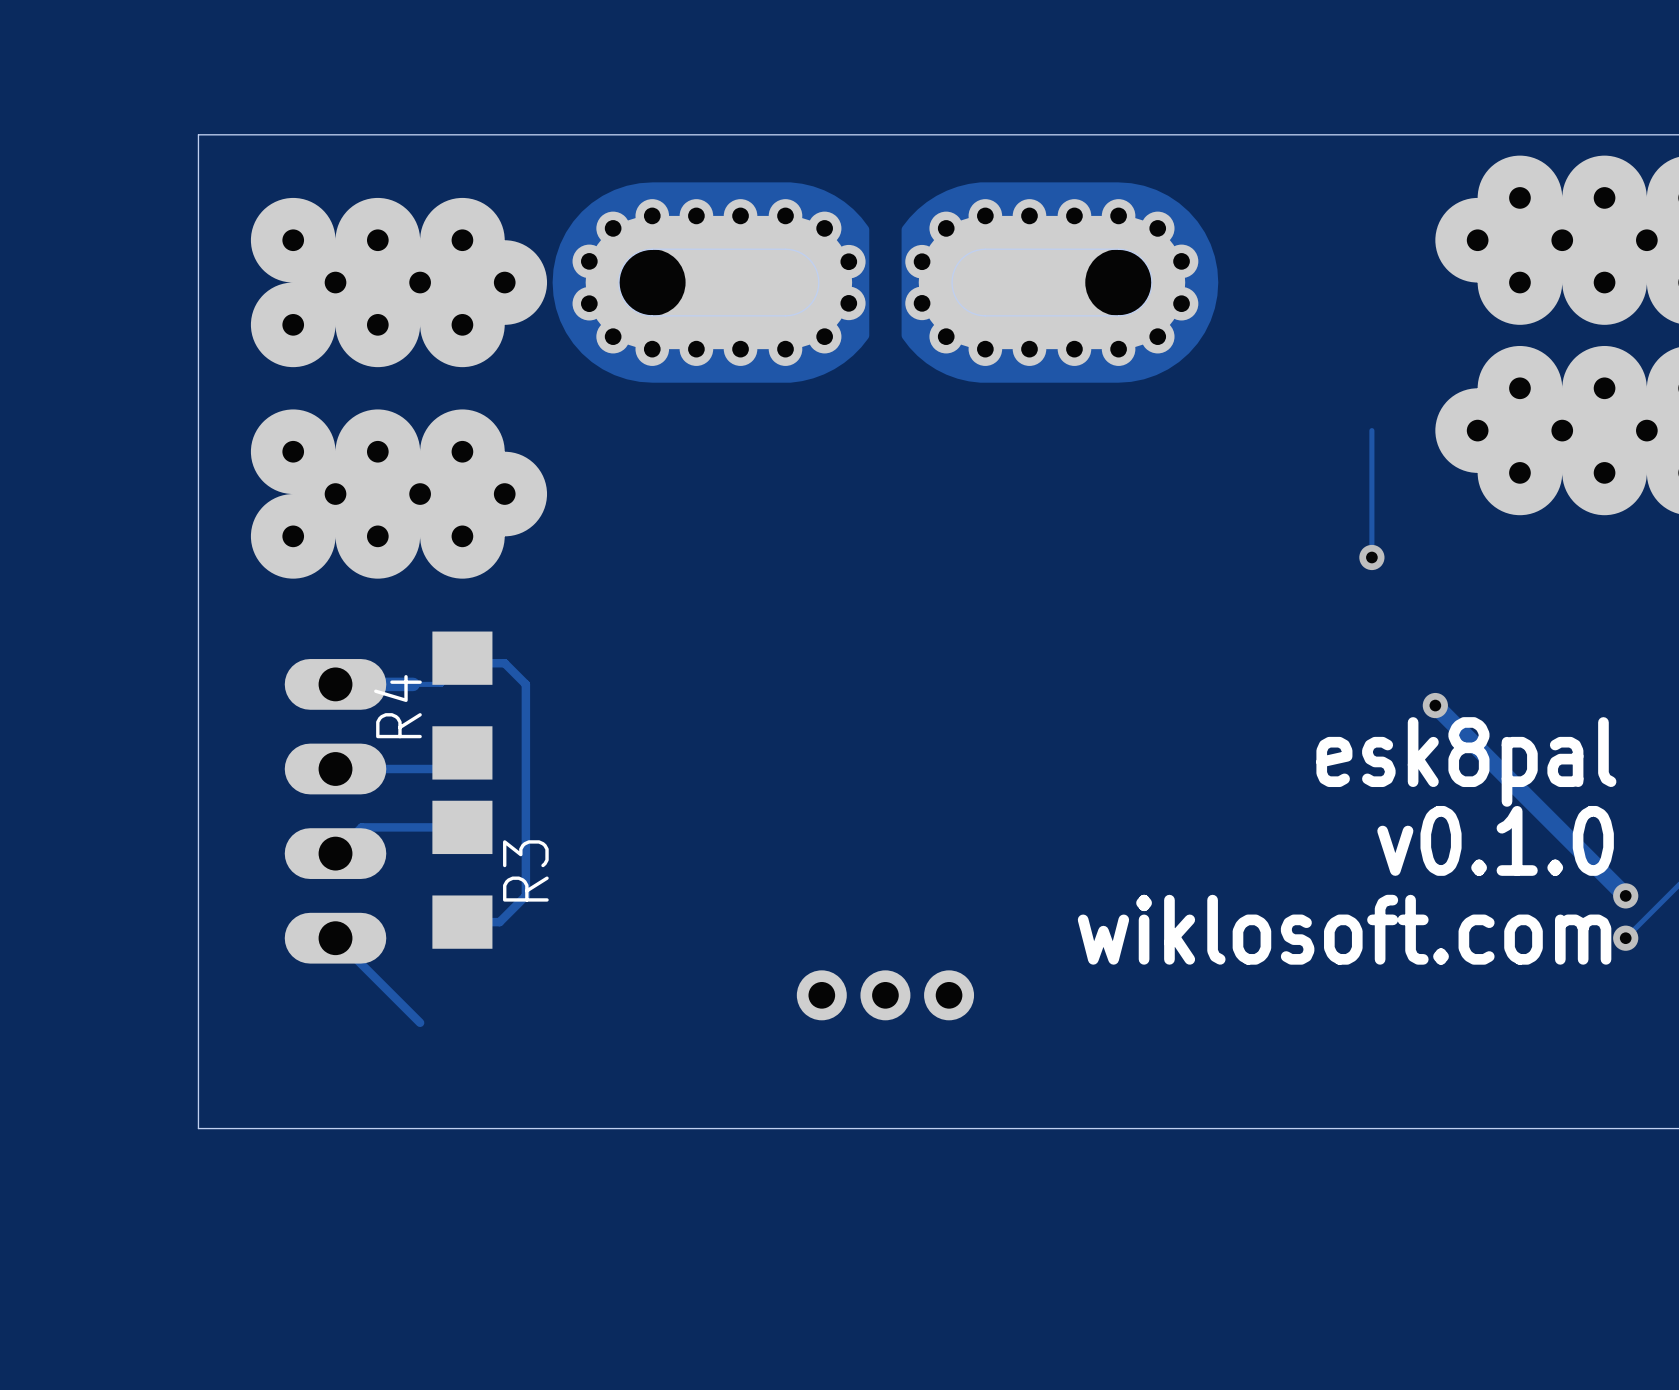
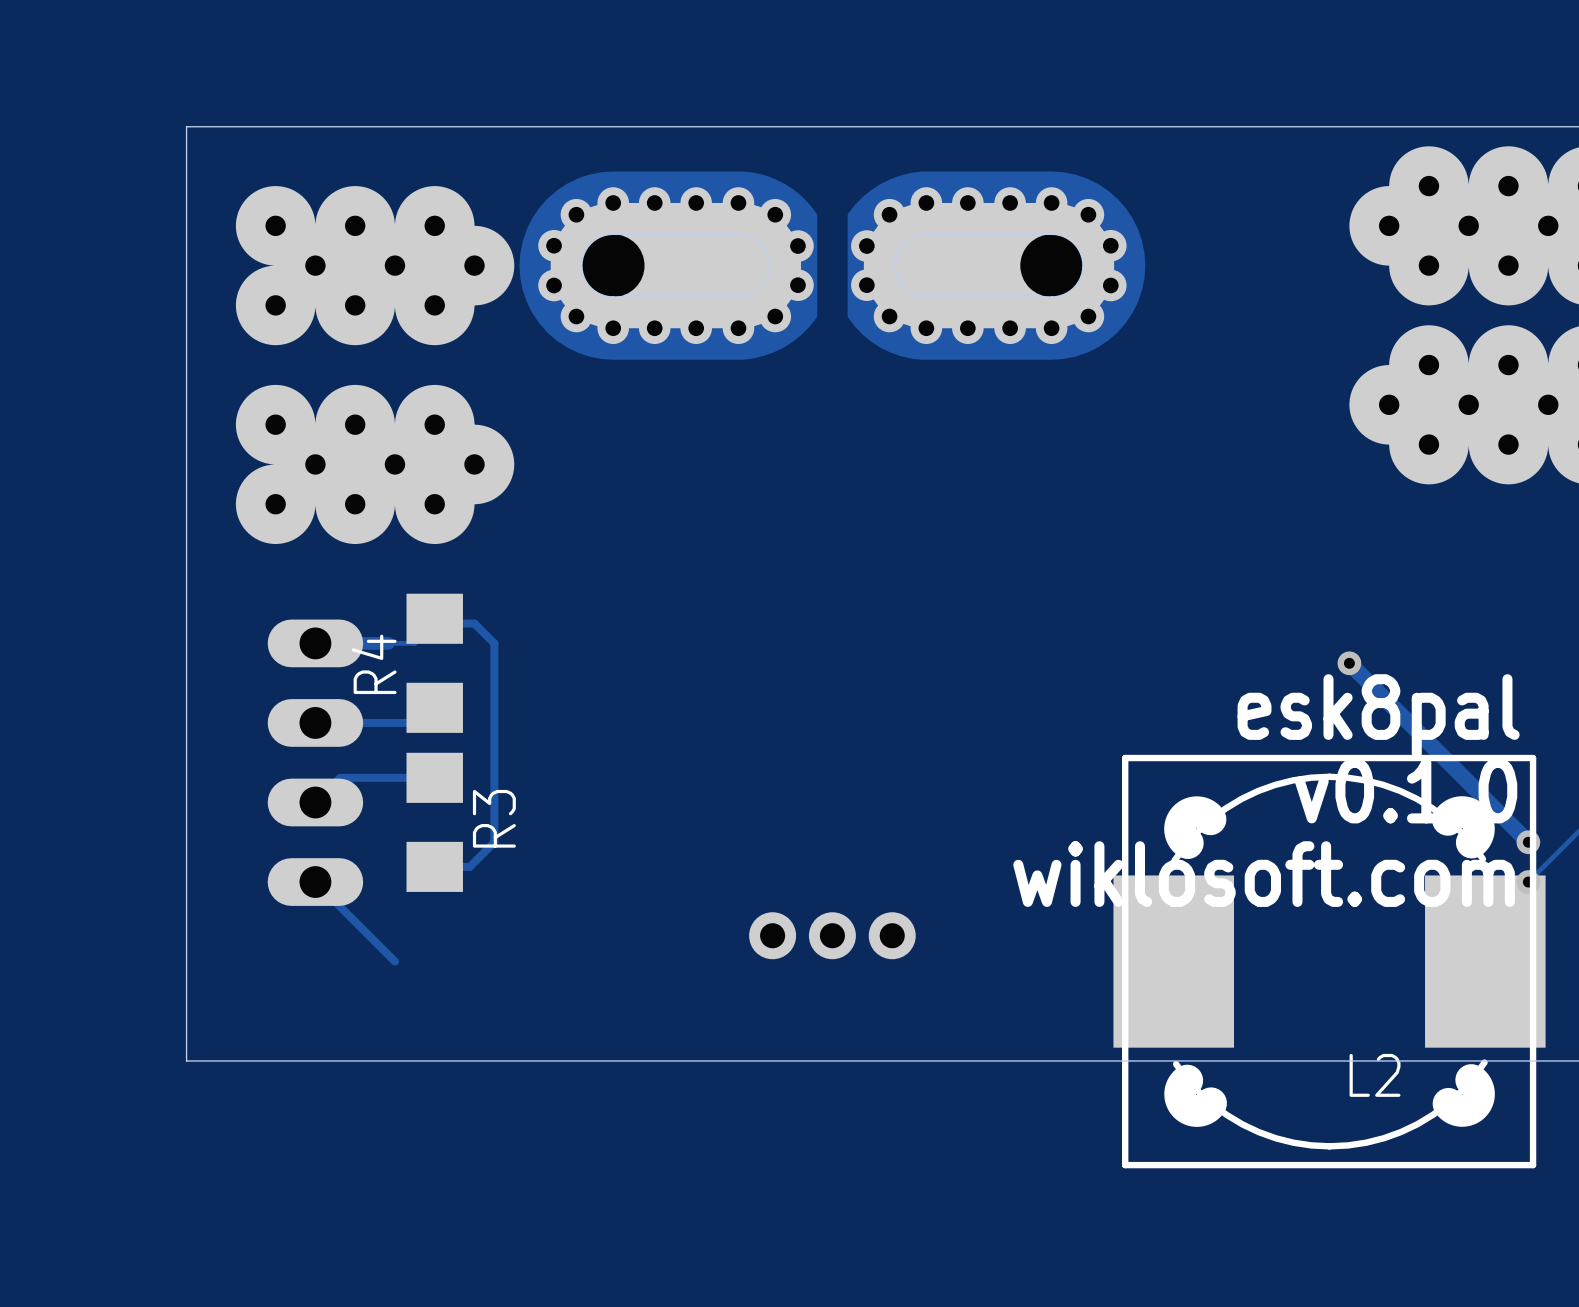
track: (1371, 430) (1371, 557) -> none
via: (1371, 557) -> none
L2: none -> (1329, 961)

